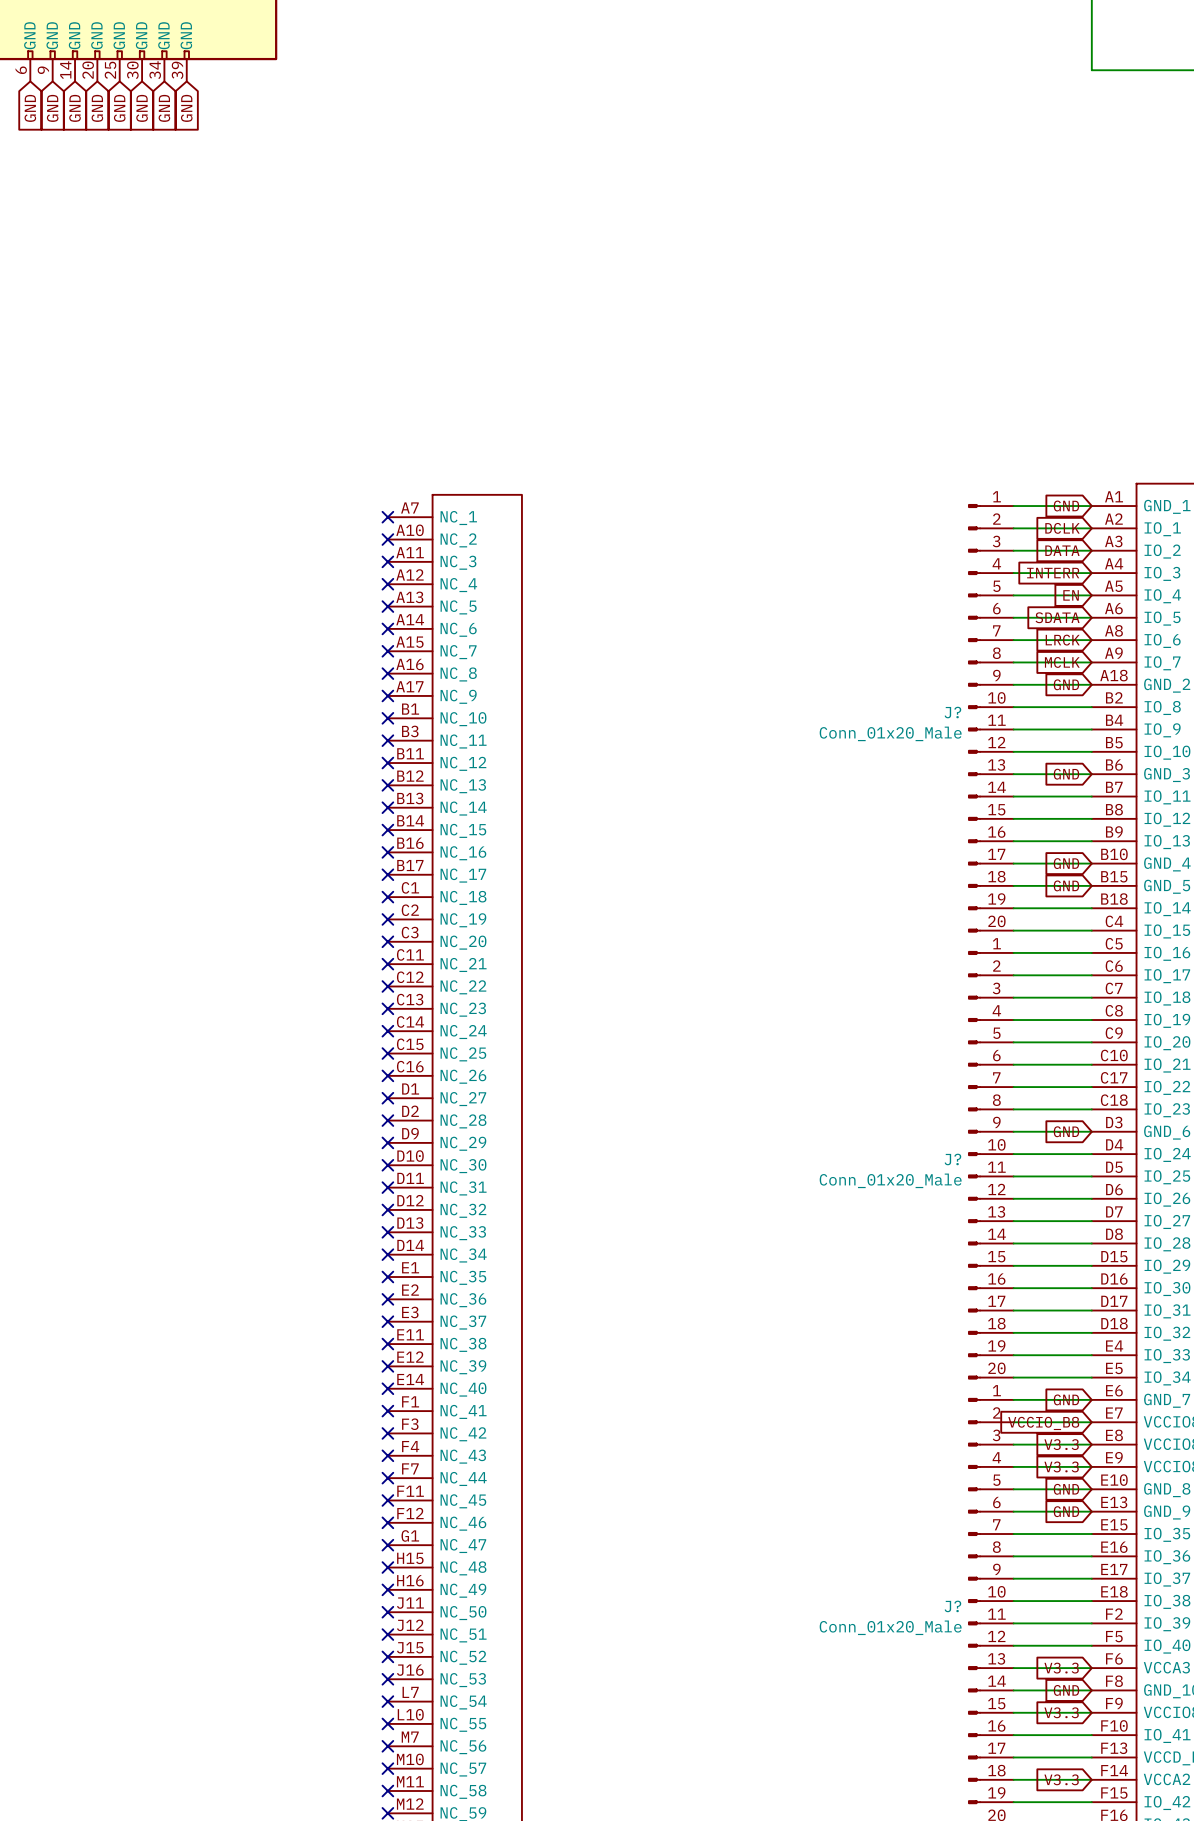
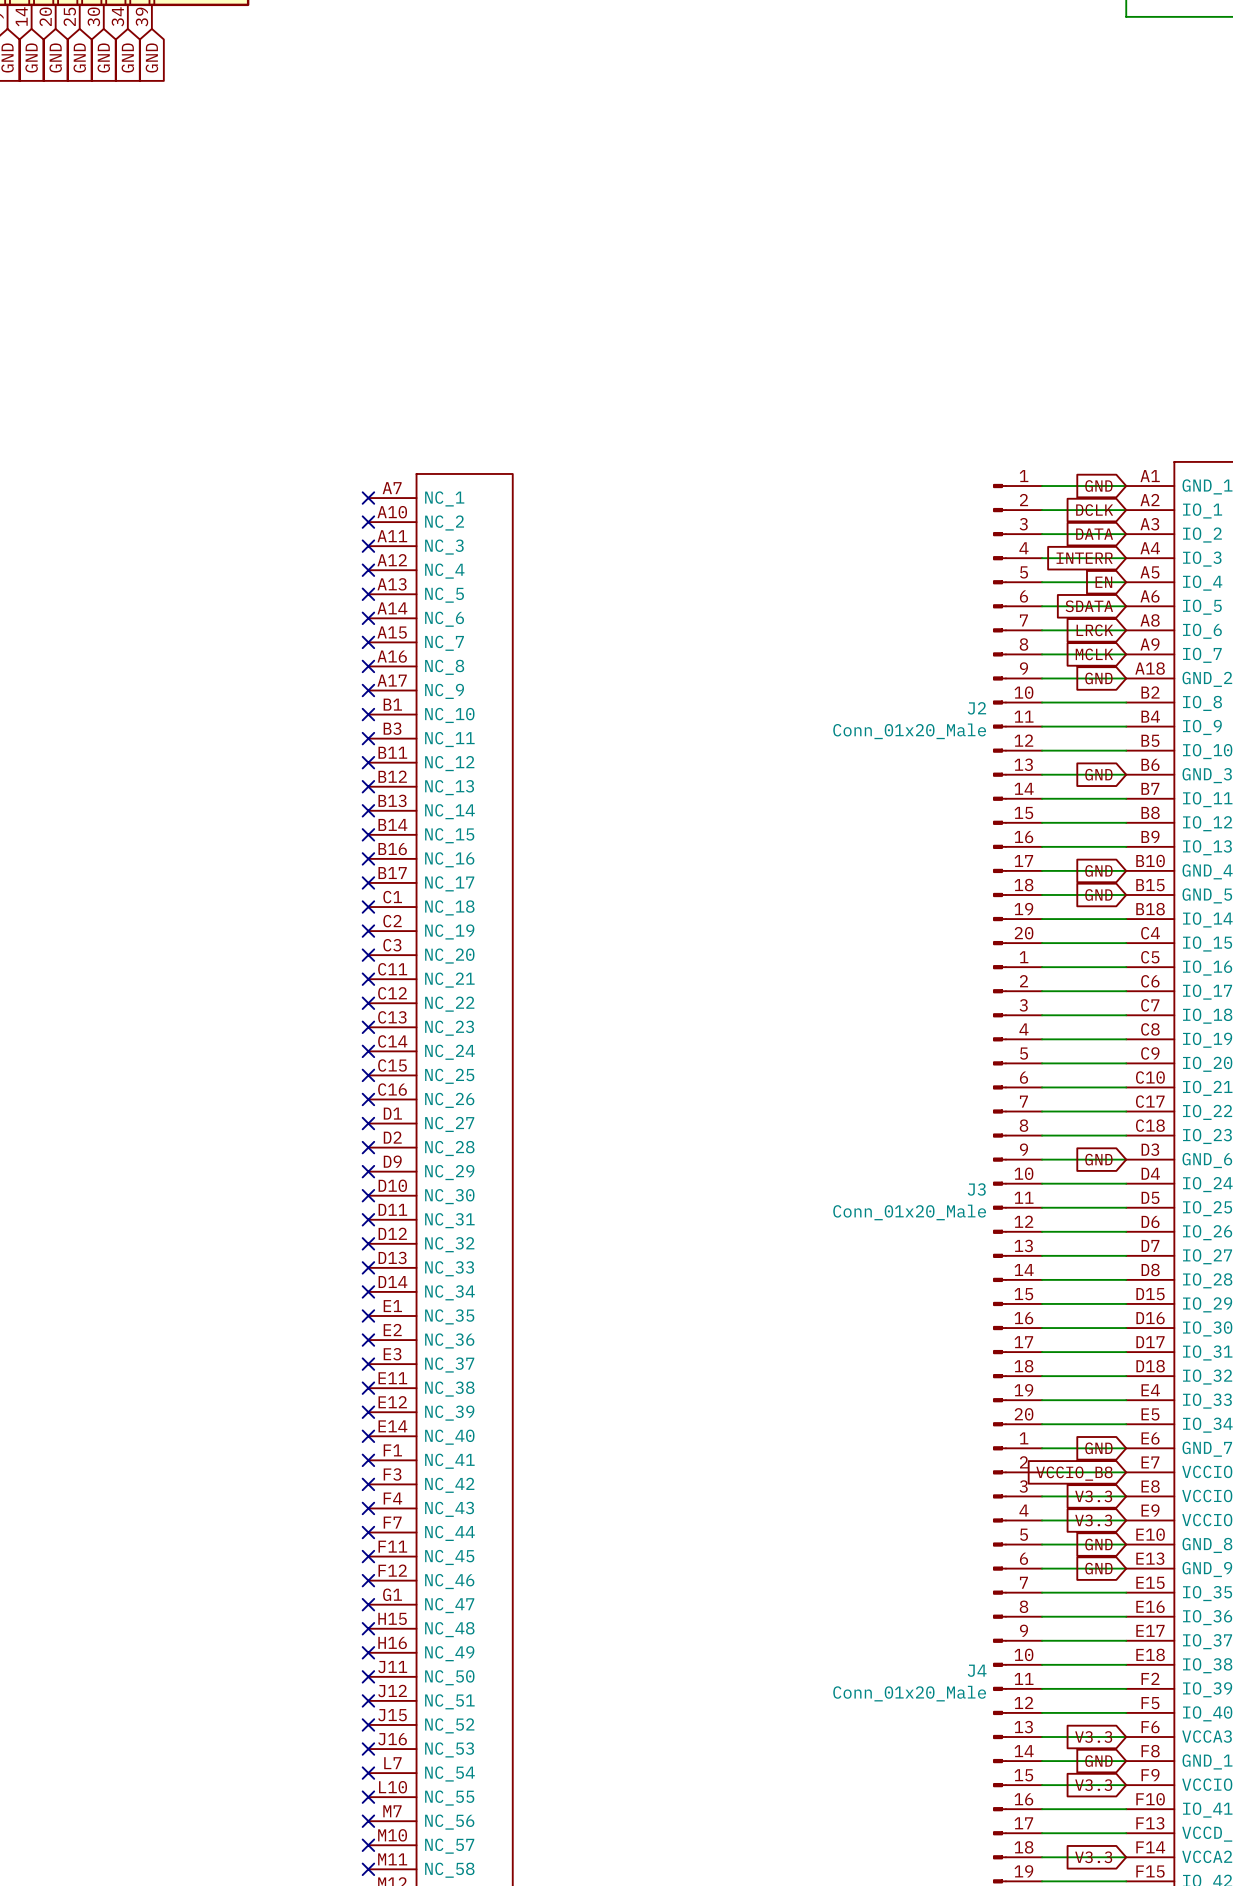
J? name: J? (952, 712) -> J2 (976, 708)
J? name: J? (952, 1159) -> J3 (976, 1189)
J? name: J? (952, 1606) -> J4 (977, 1670)

